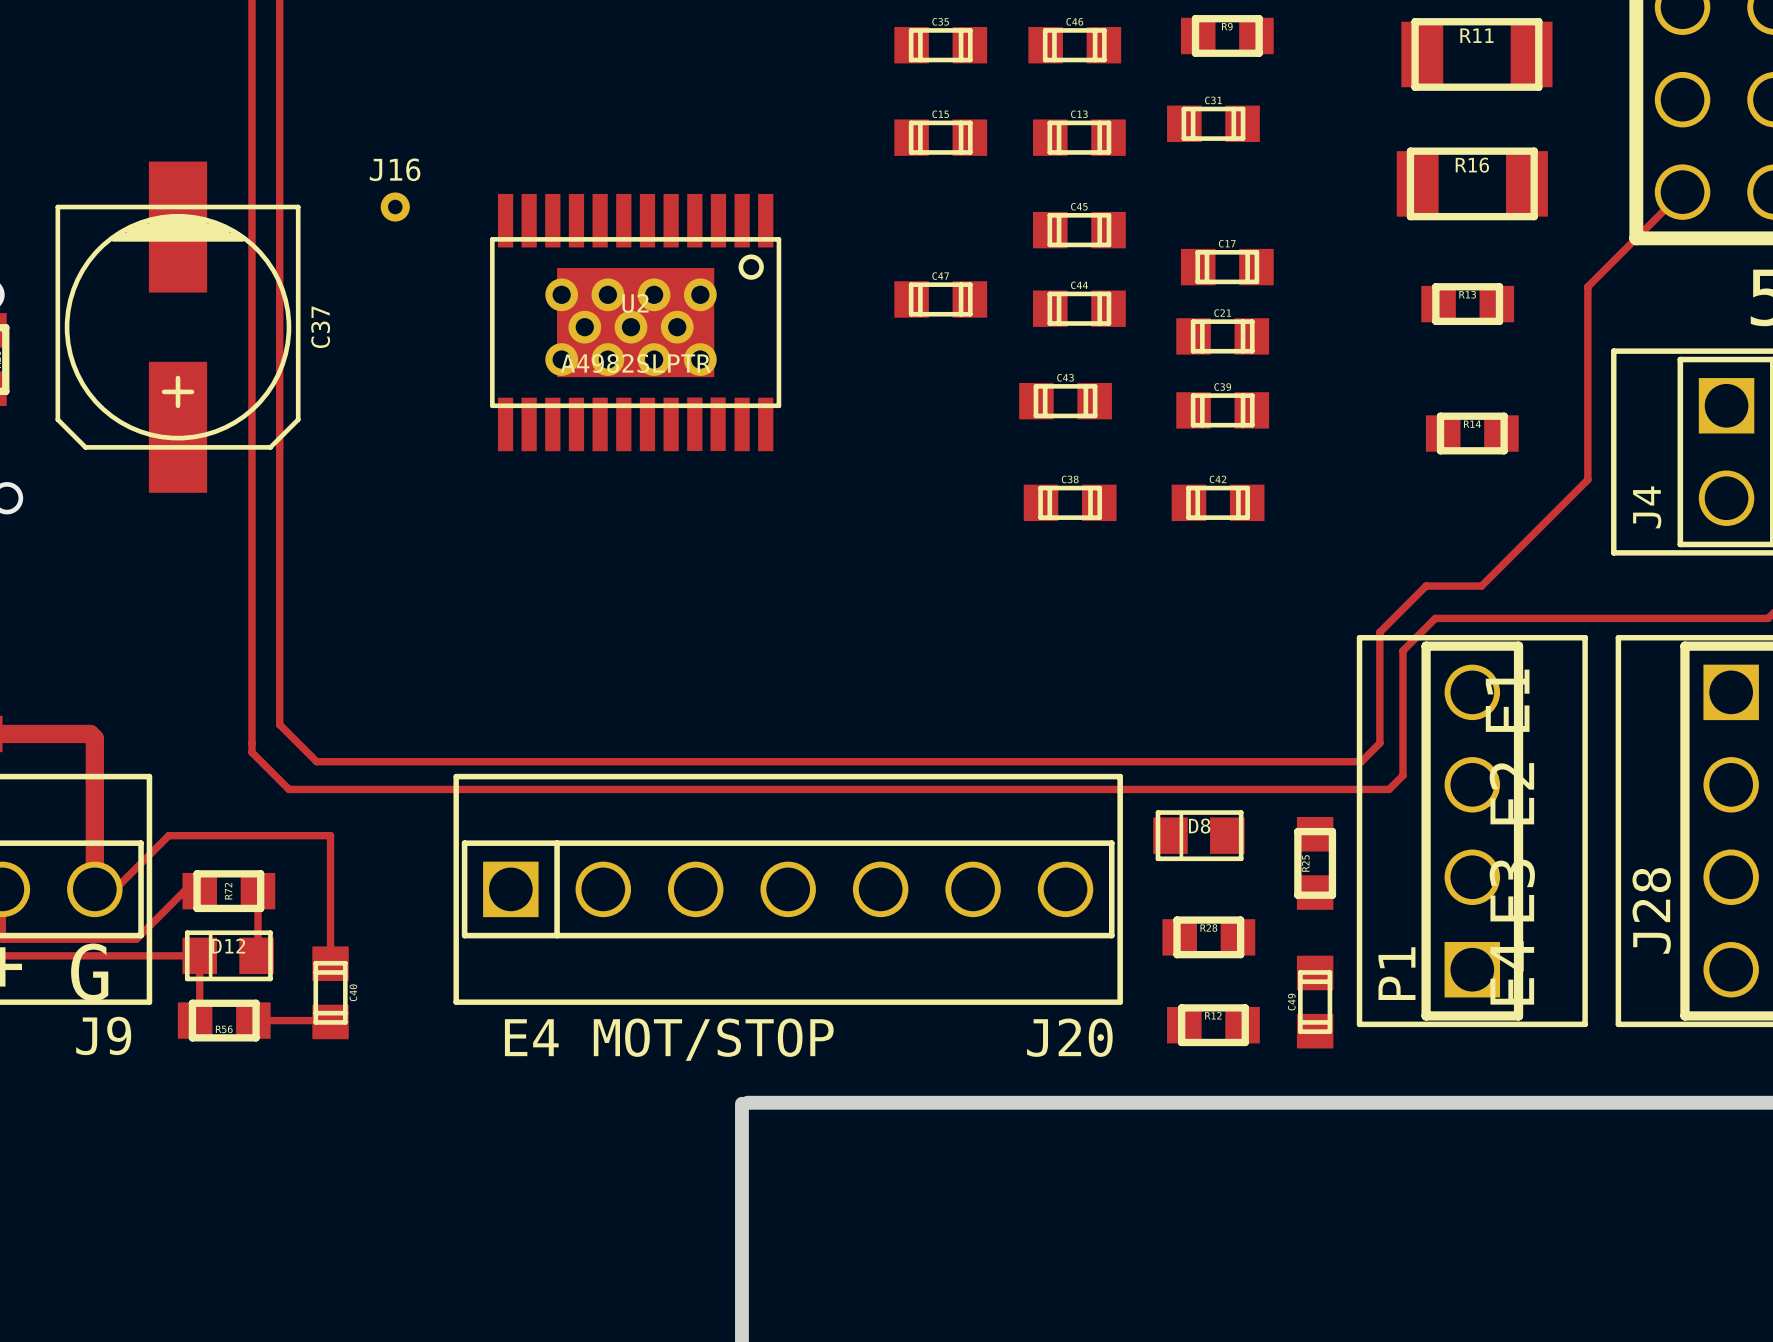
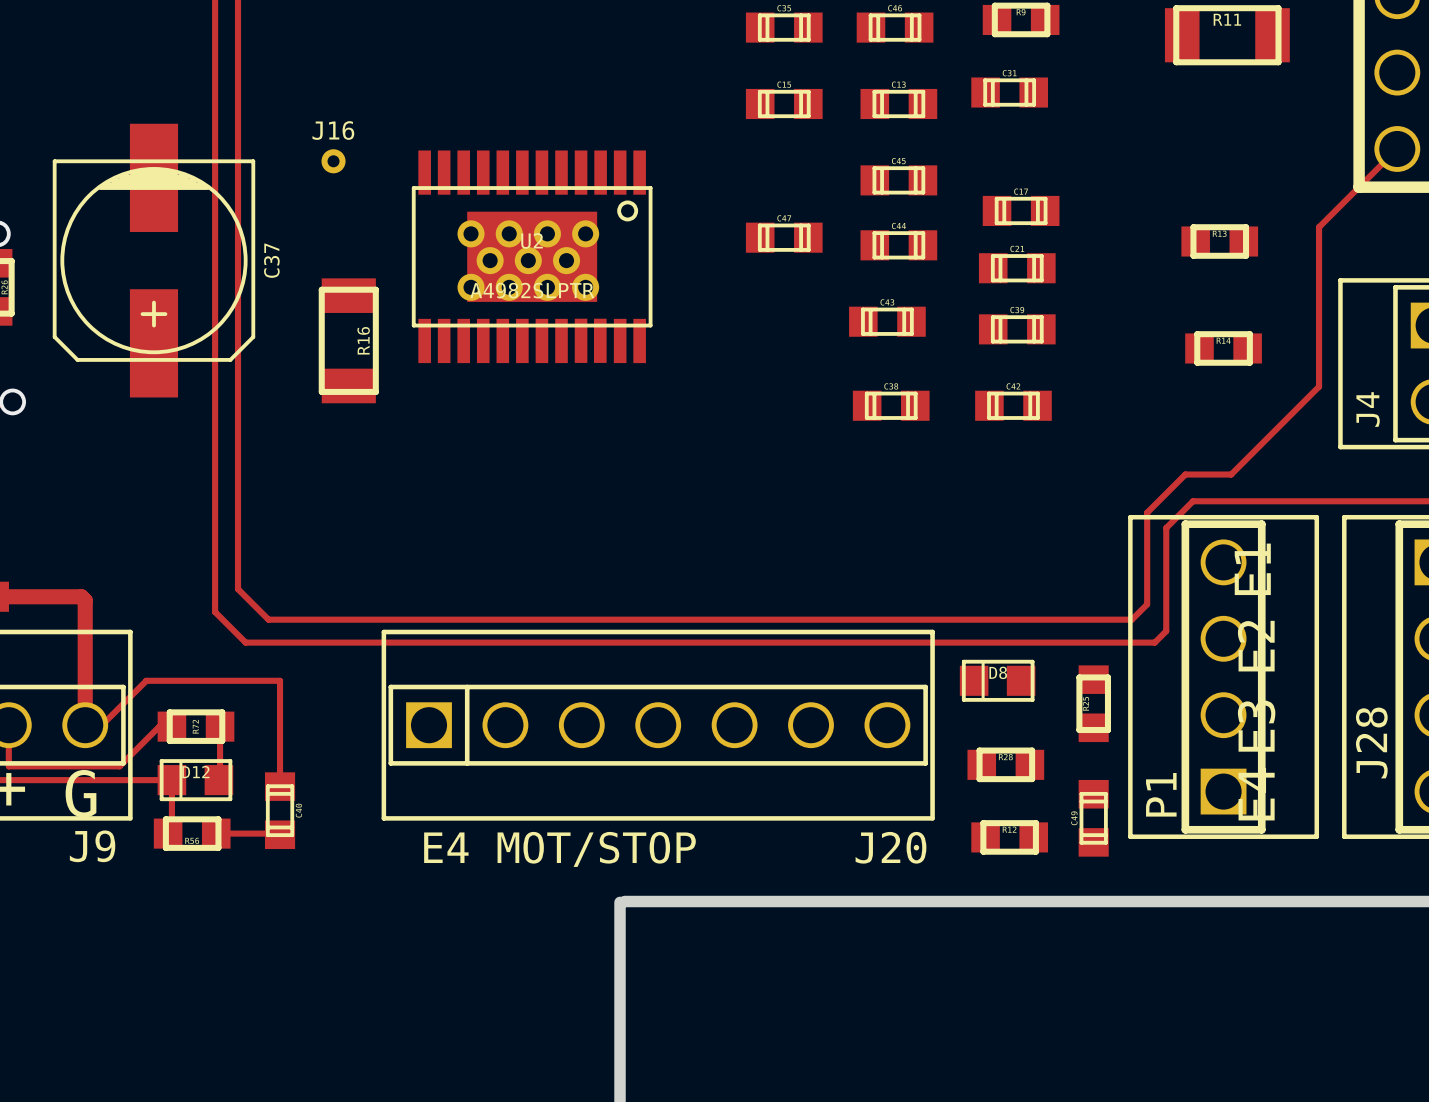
R16 rotation: 0° (1472, 183) -> 90° clockwise (348, 340)
R16 position: (1472, 183) -> (348, 340)

